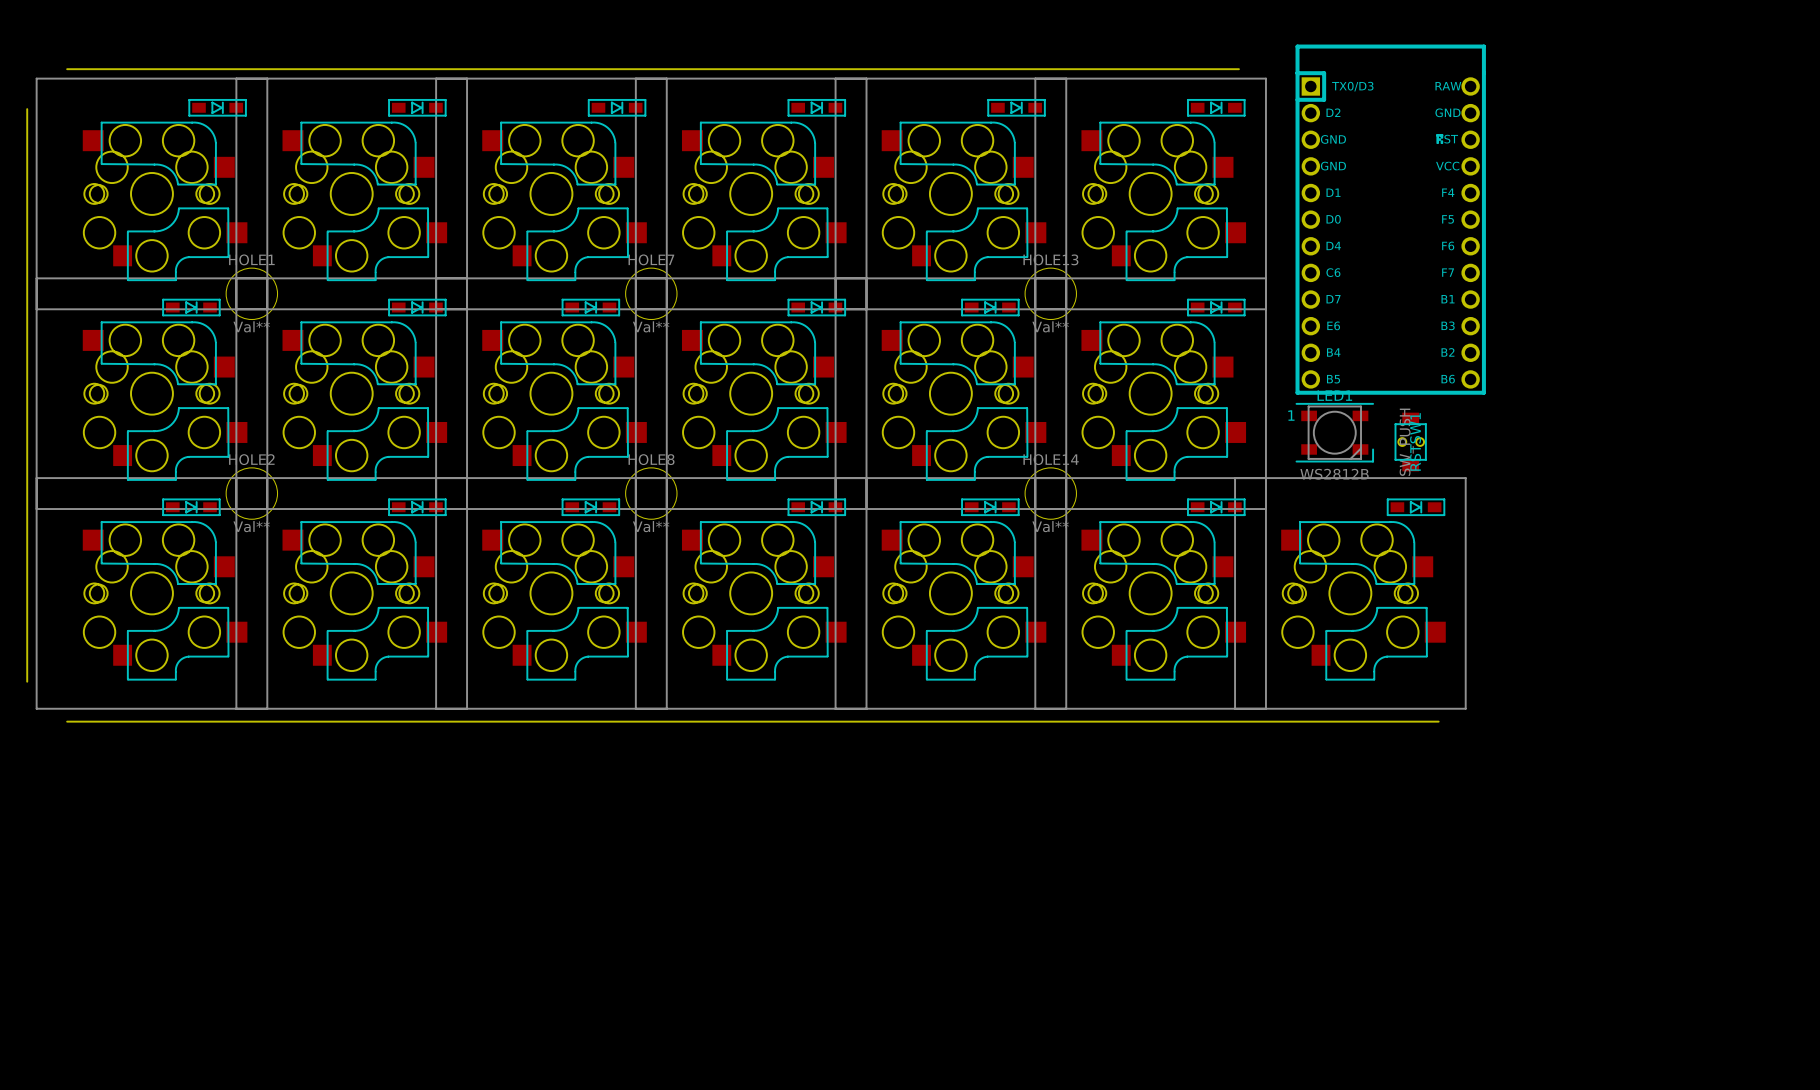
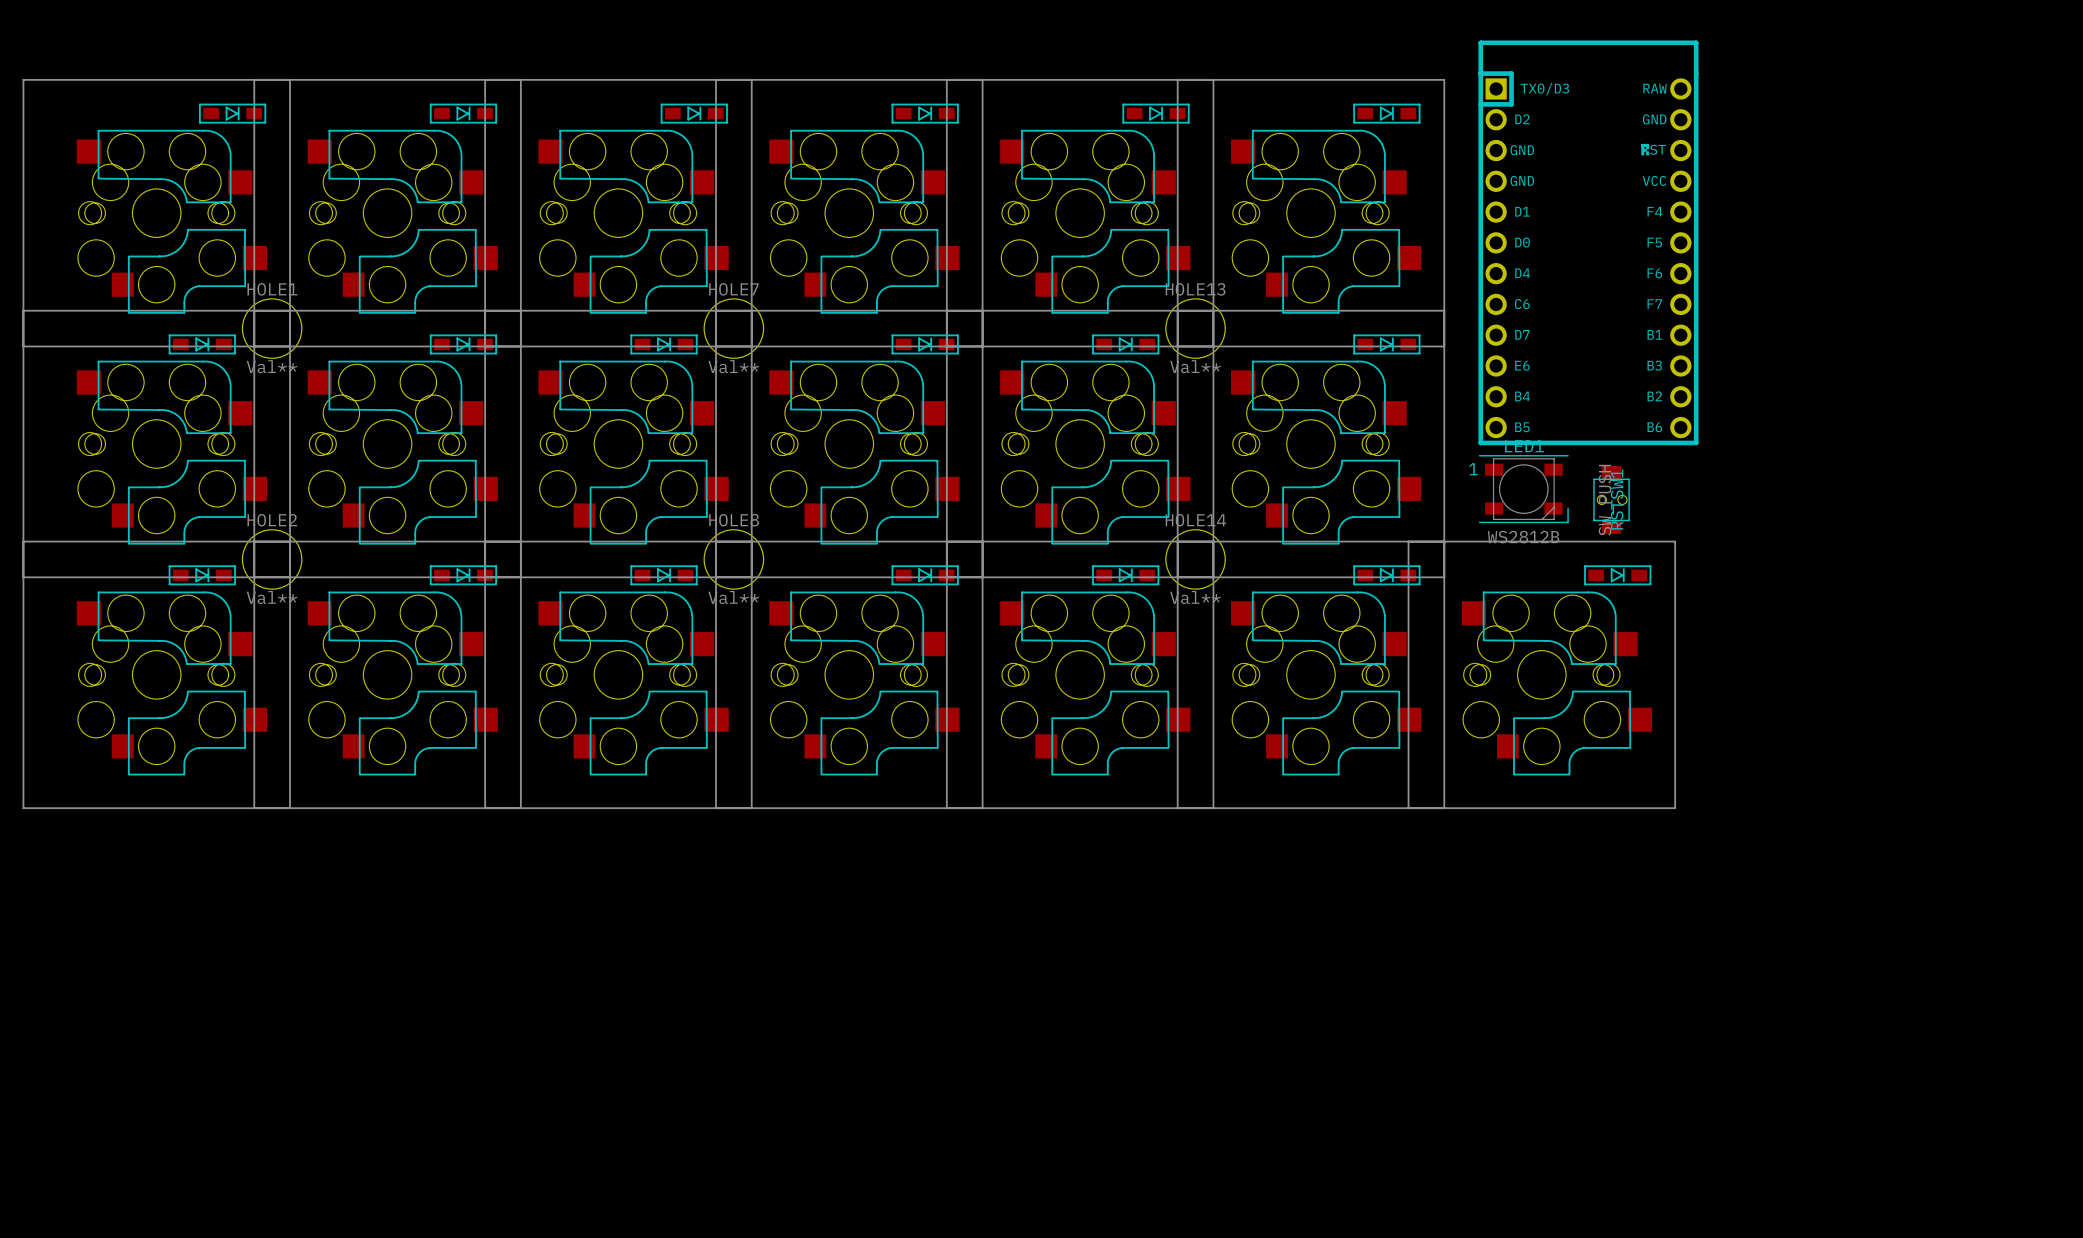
board edge: (67, 69) (1238, 69) -> none
board edge: (27, 109) (27, 681) -> none
board edge: (67, 721) (1438, 721) -> none

